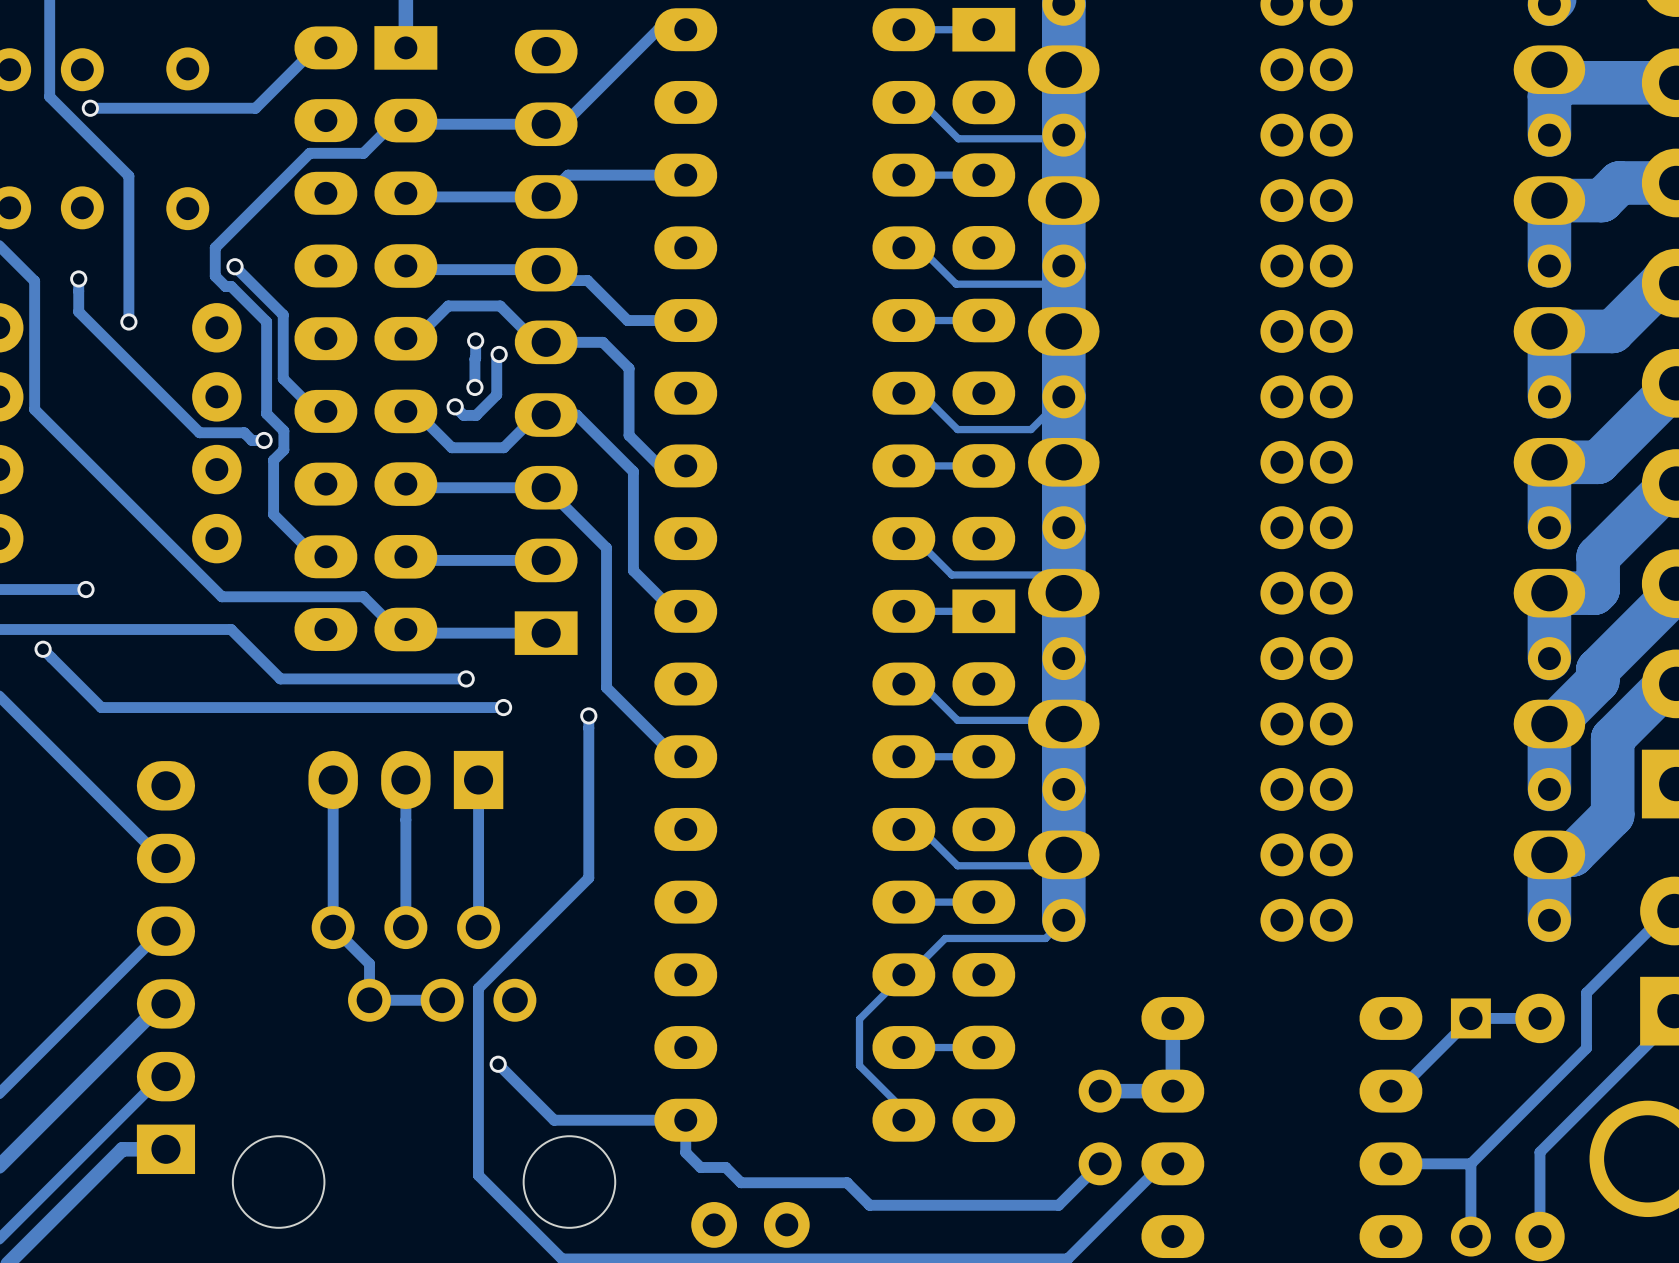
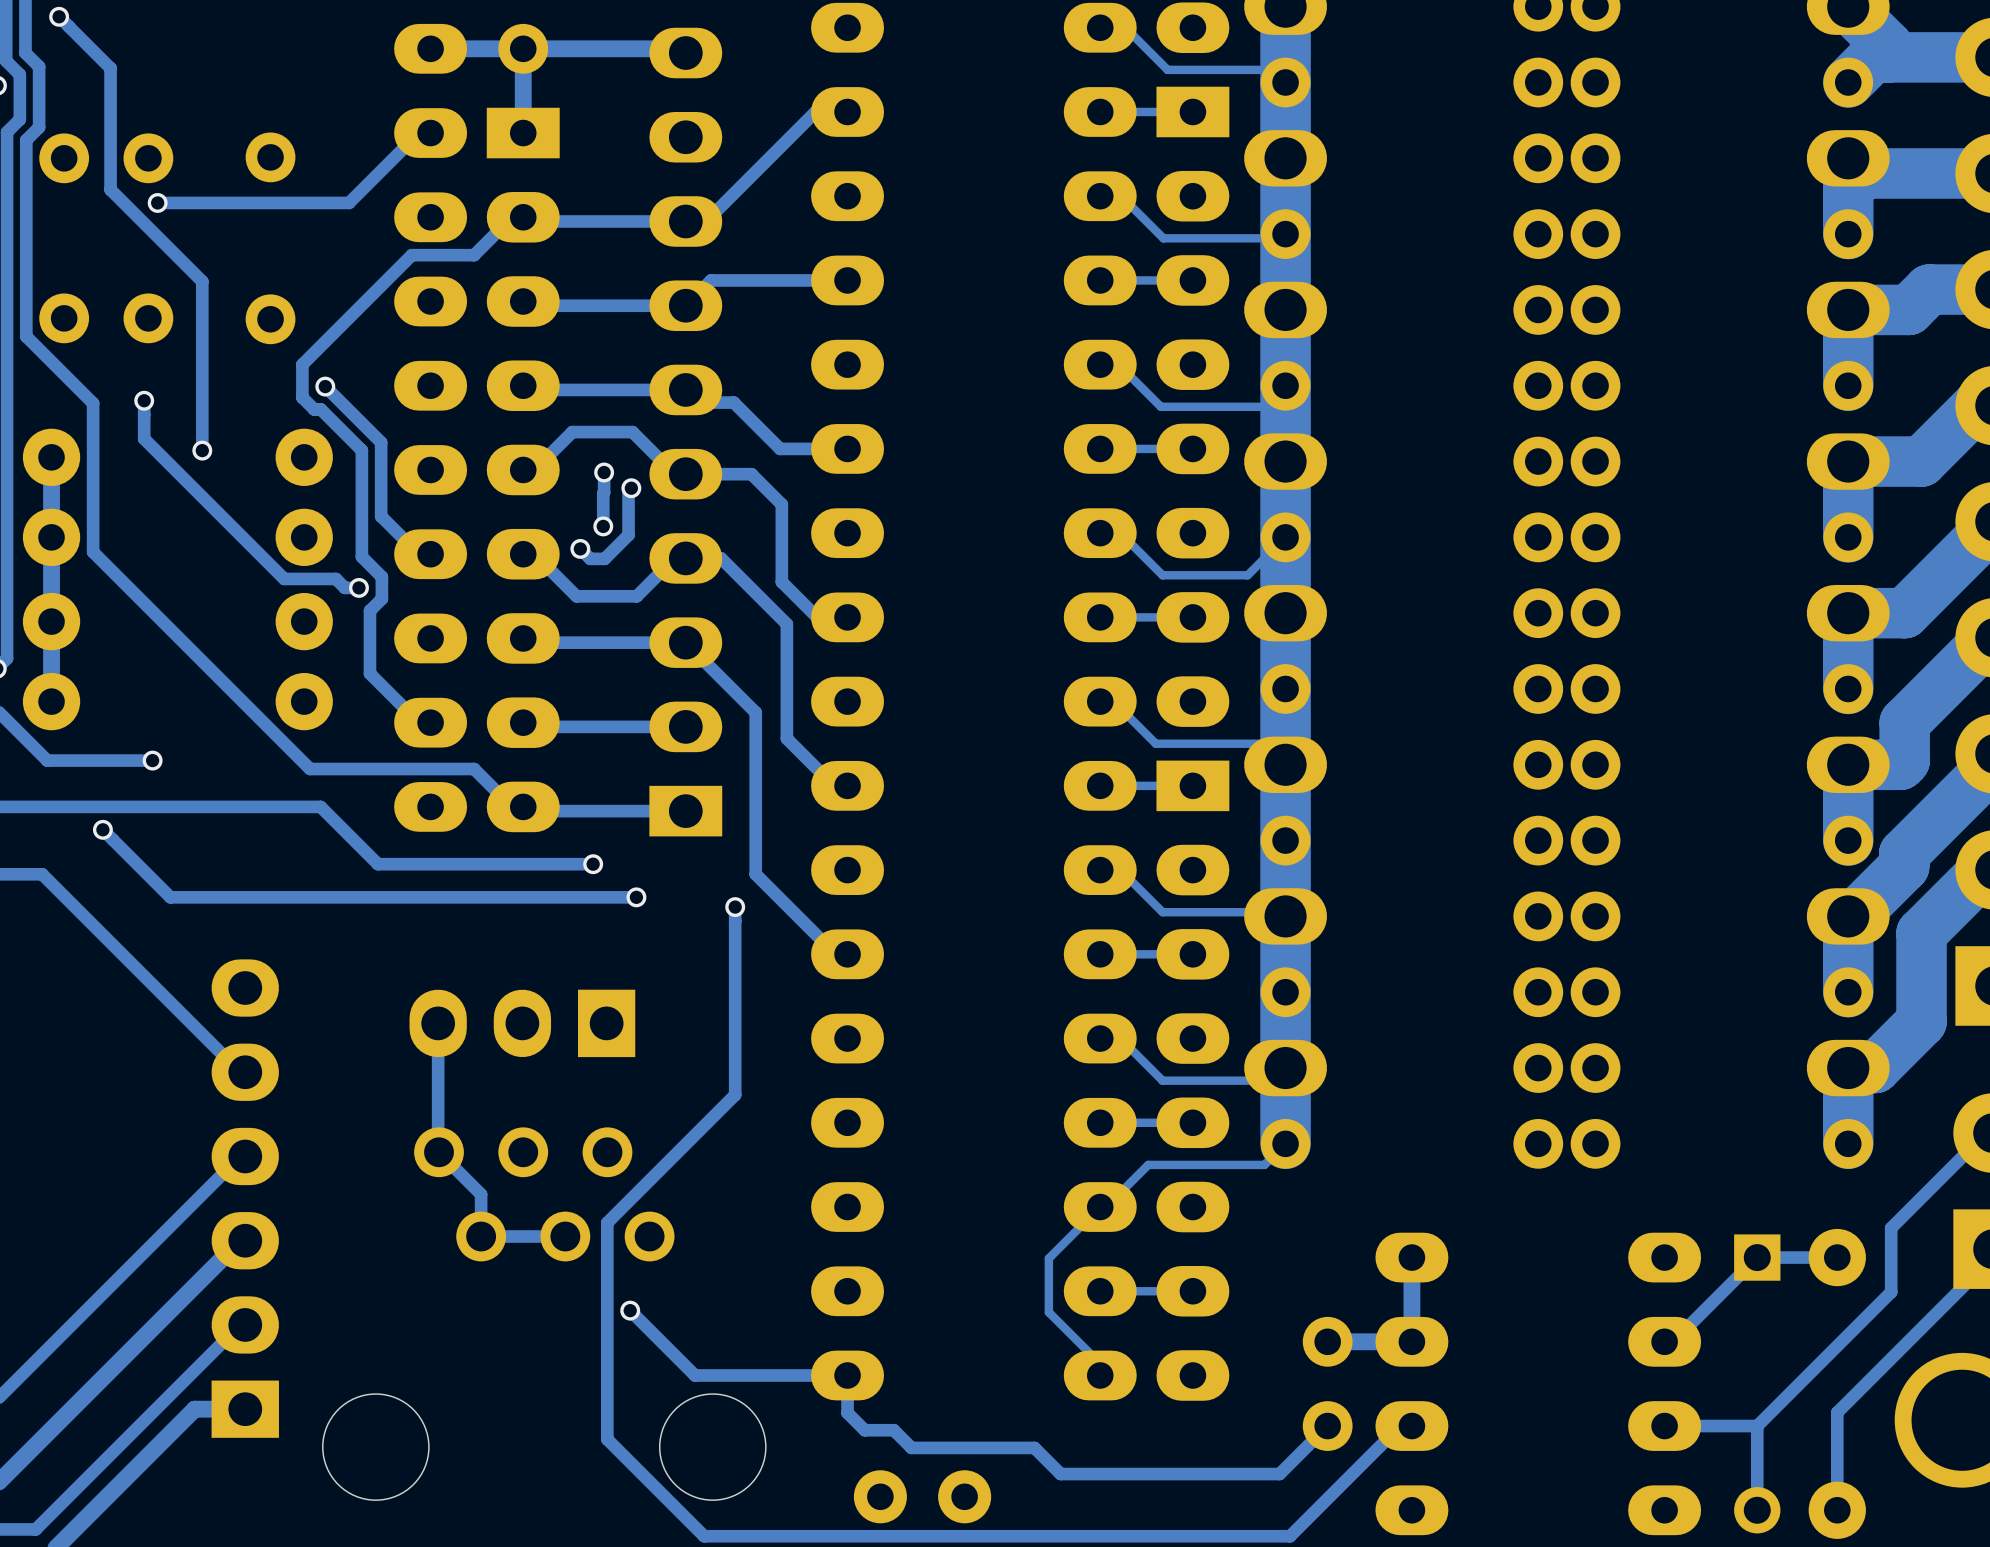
track: (333, 779) (333, 927) -> (438, 1023) (439, 1152)
track: (405, 779) (405, 927) -> none
part position: (405, 779) -> (522, 1023)
track: (478, 779) (478, 927) -> none

